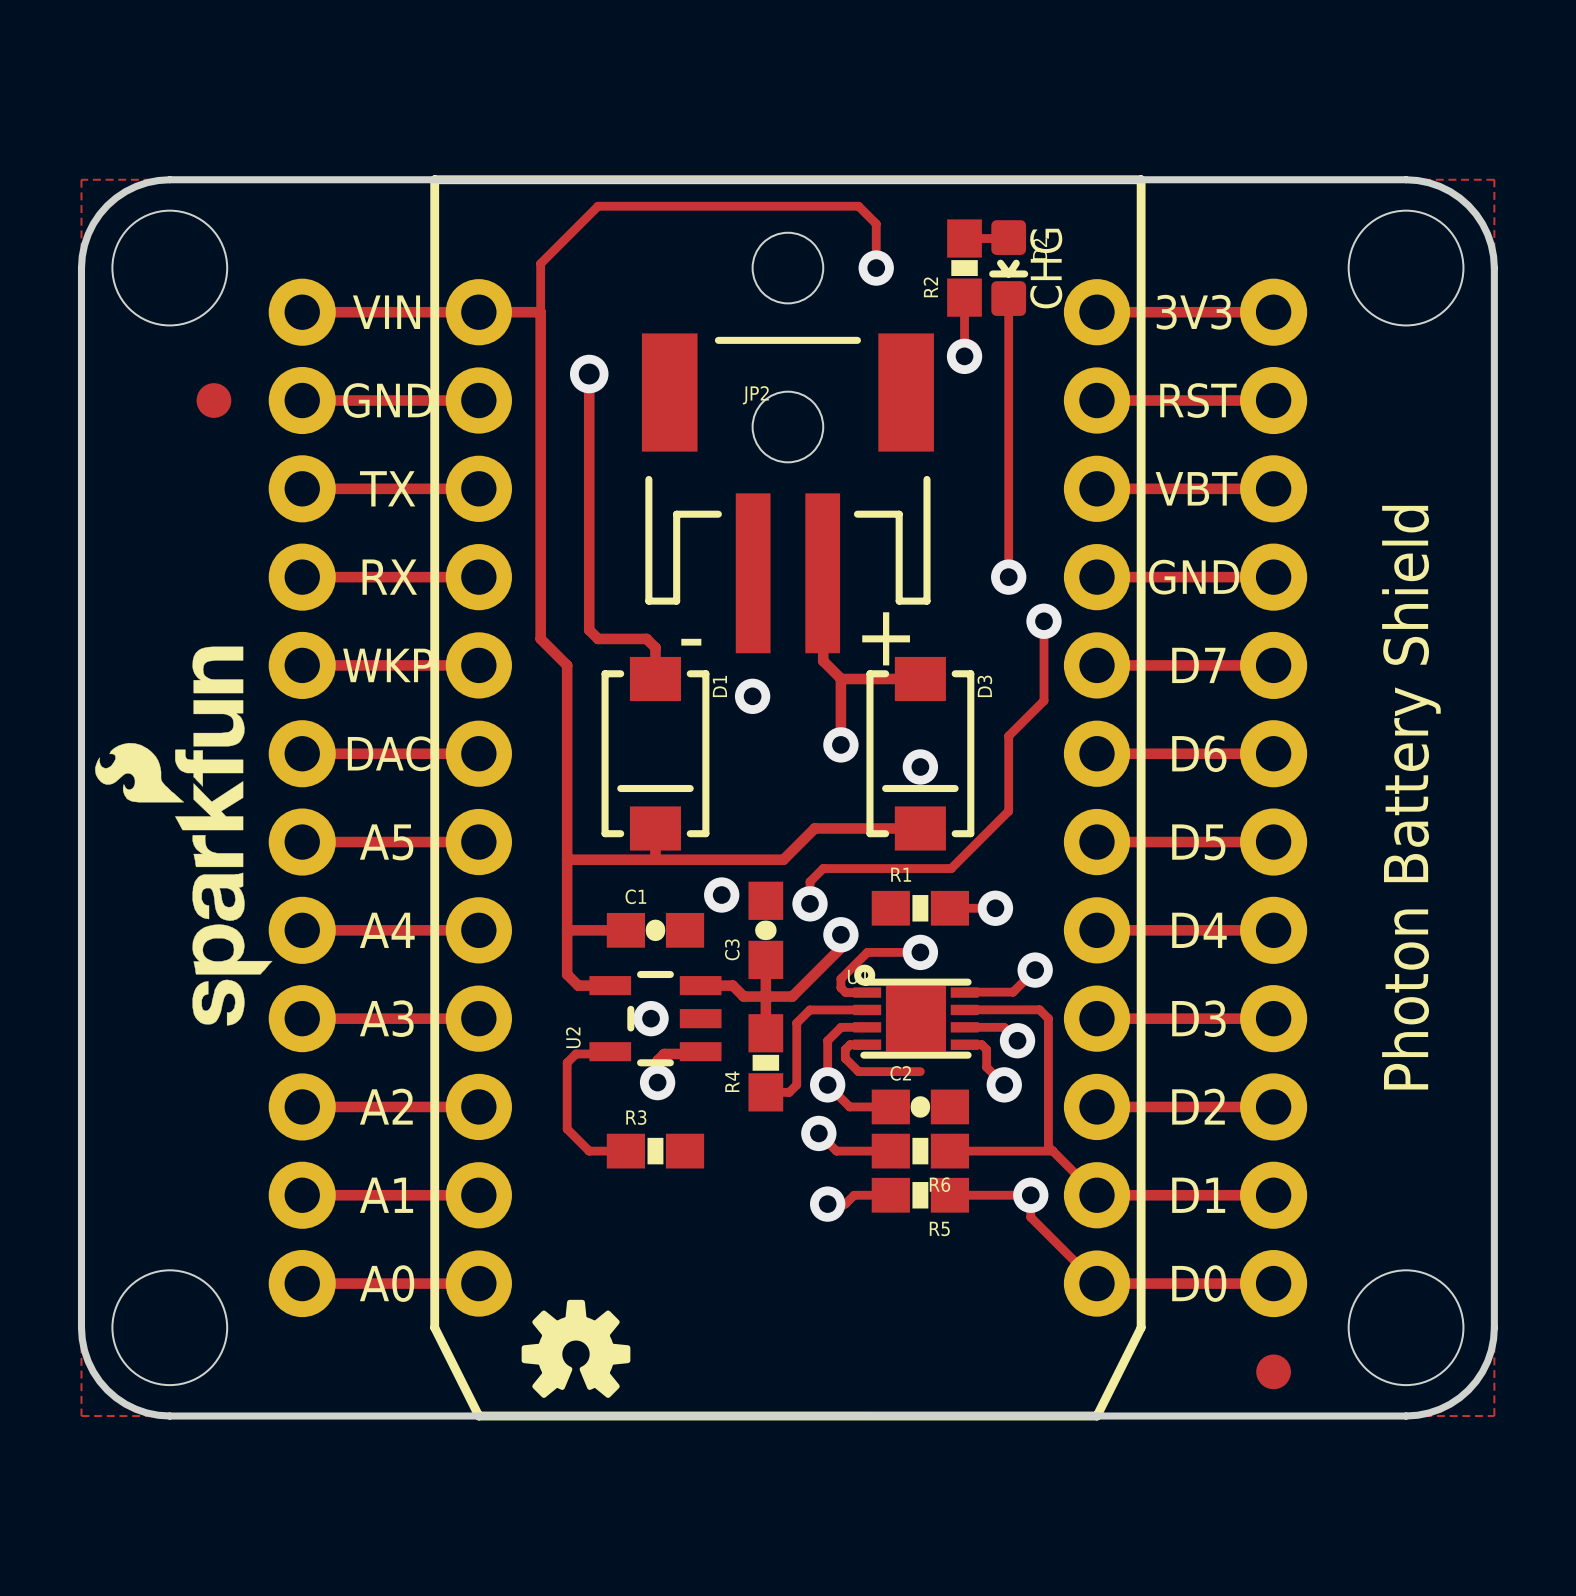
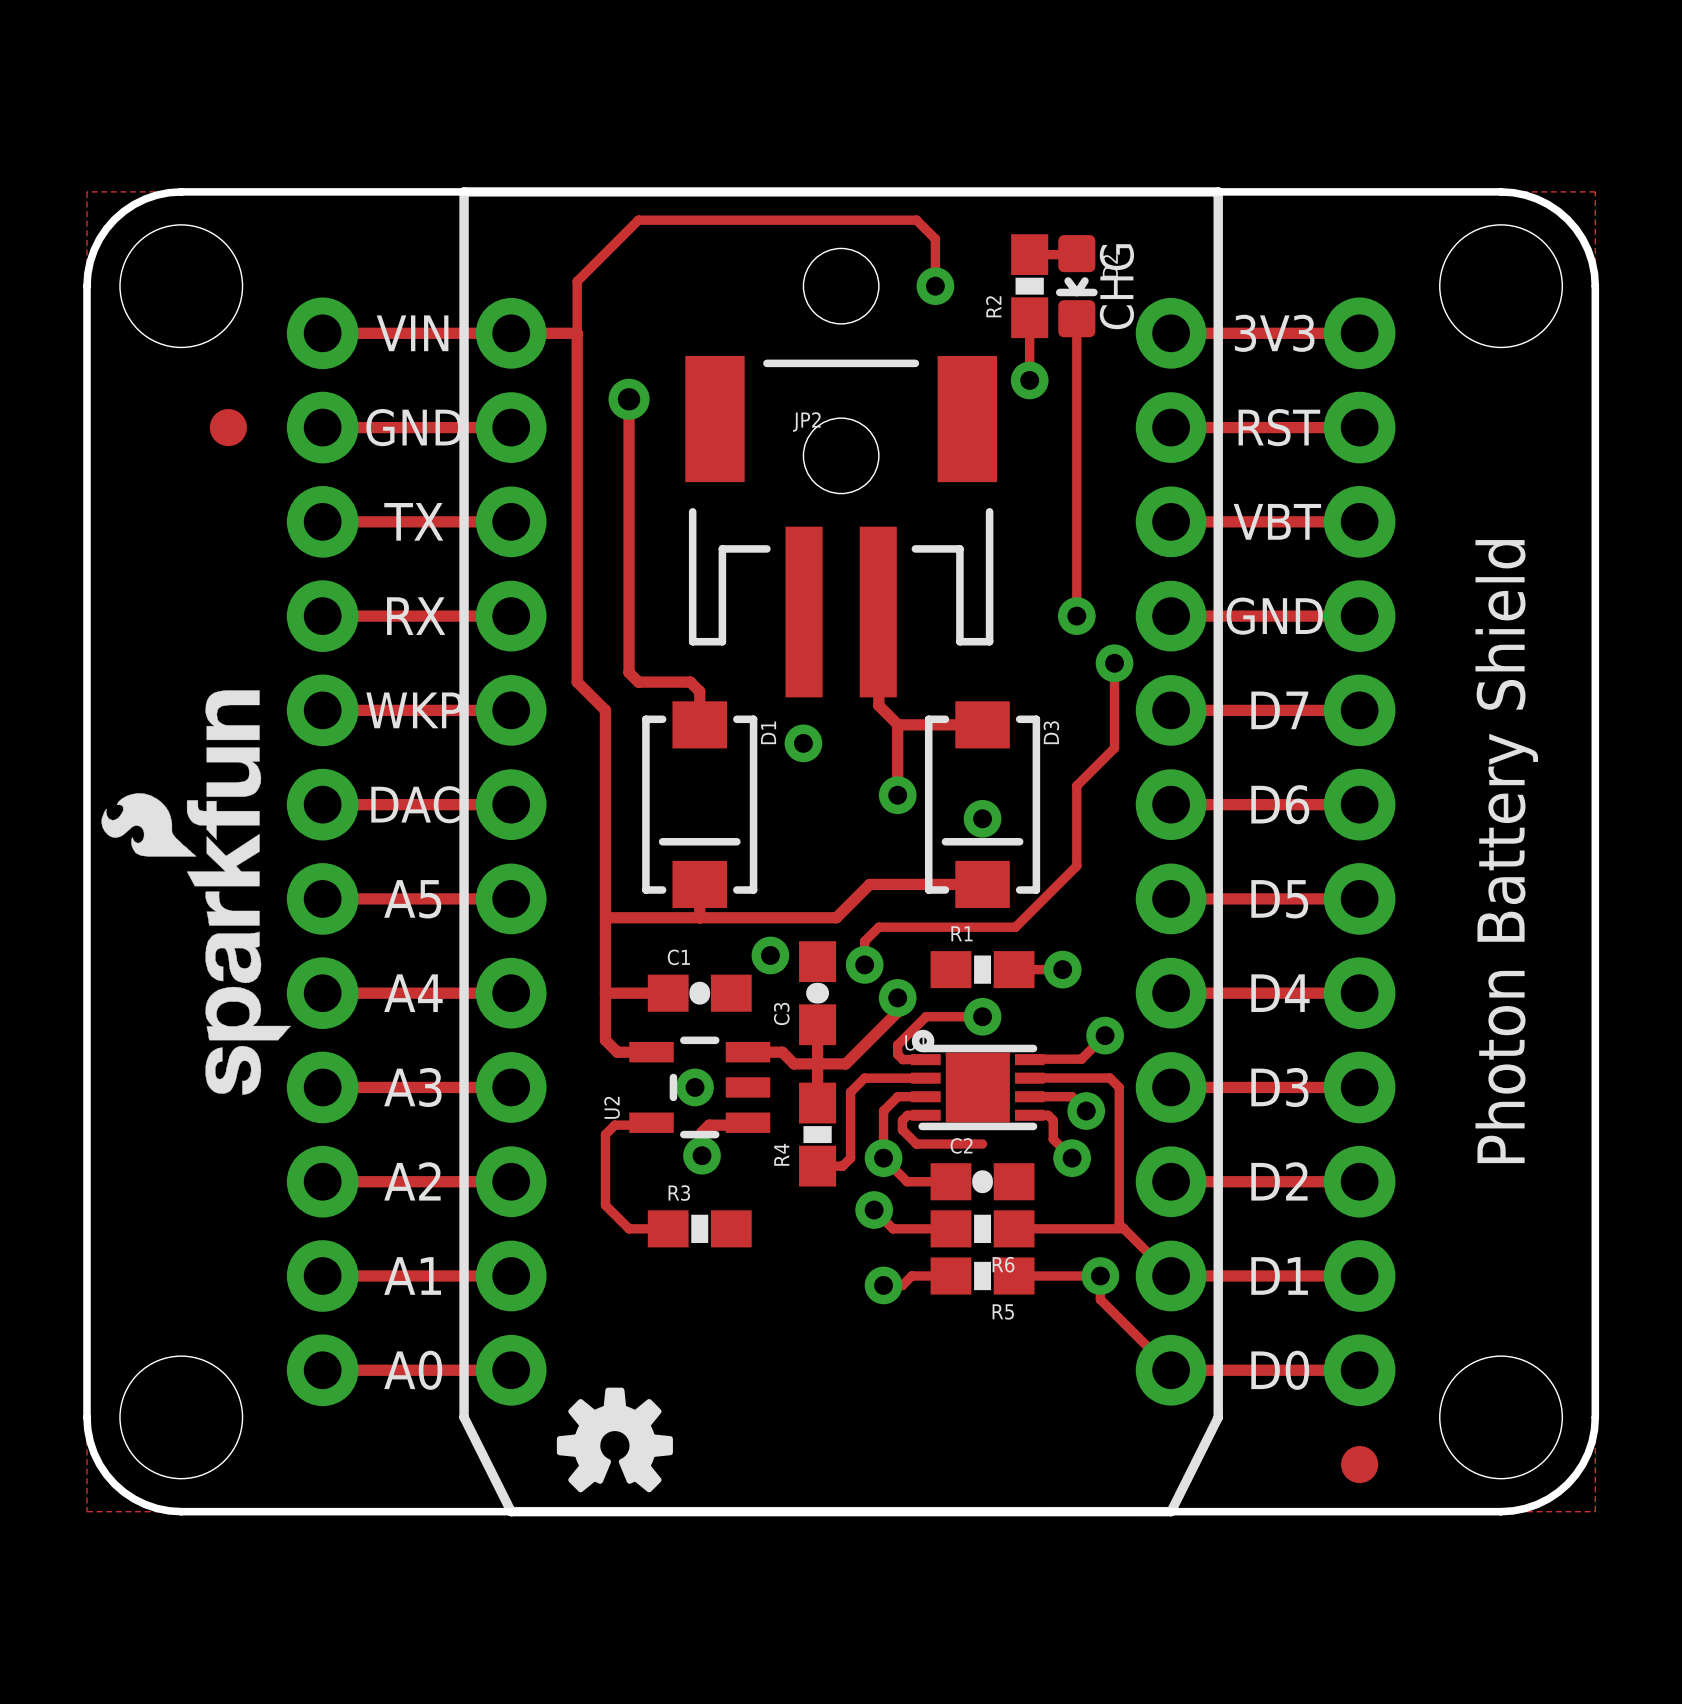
JP2 text: + (886, 638) -> none
JP2 text: - (691, 642) -> none

